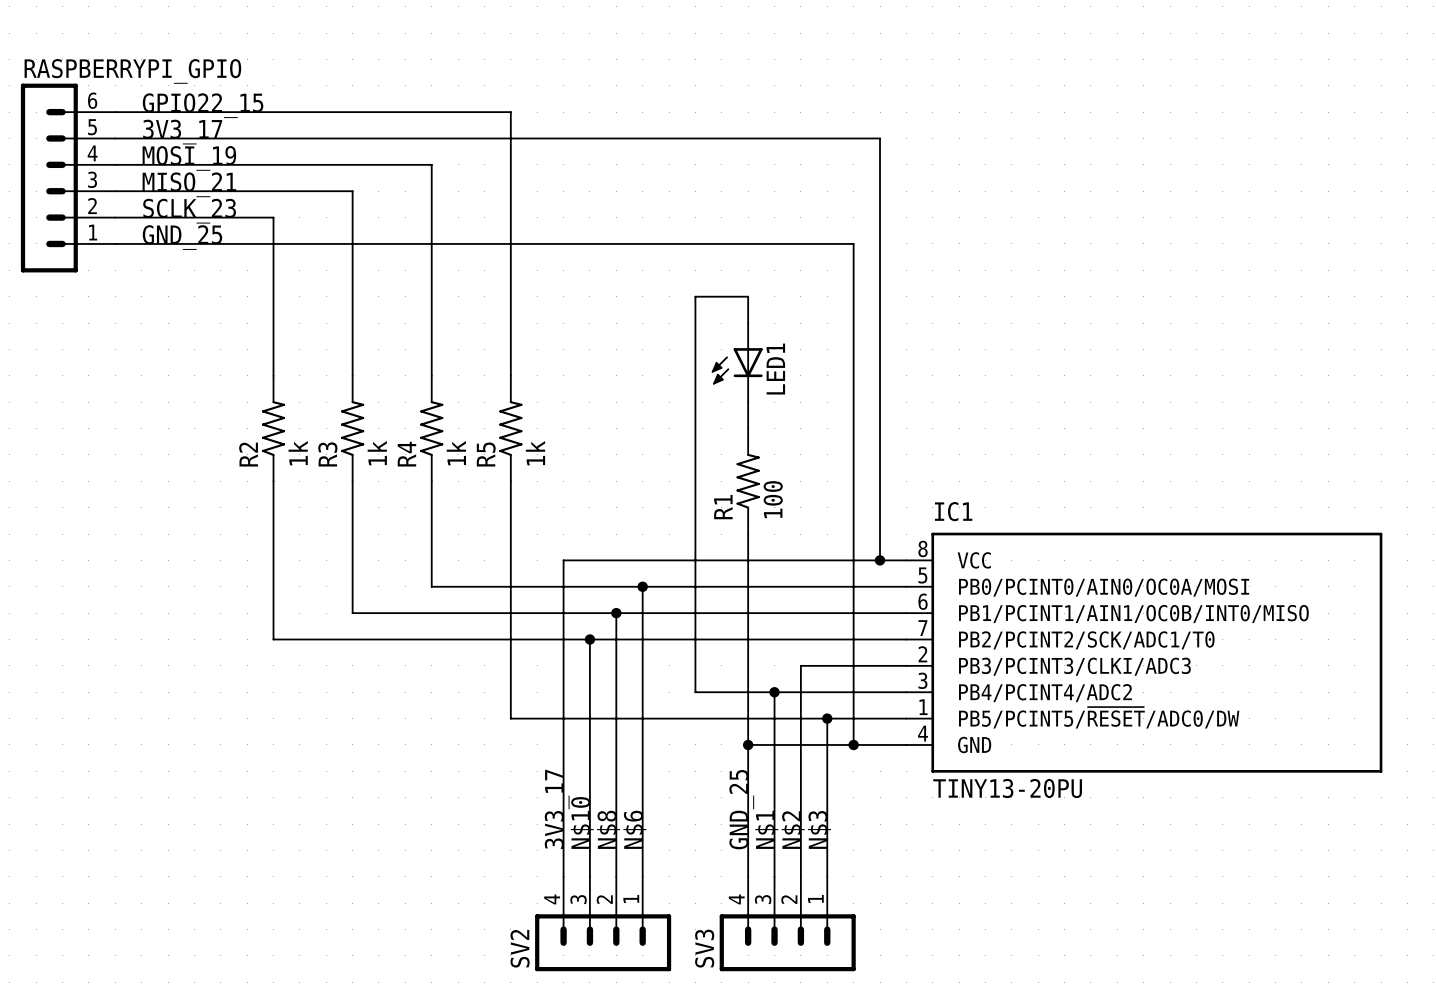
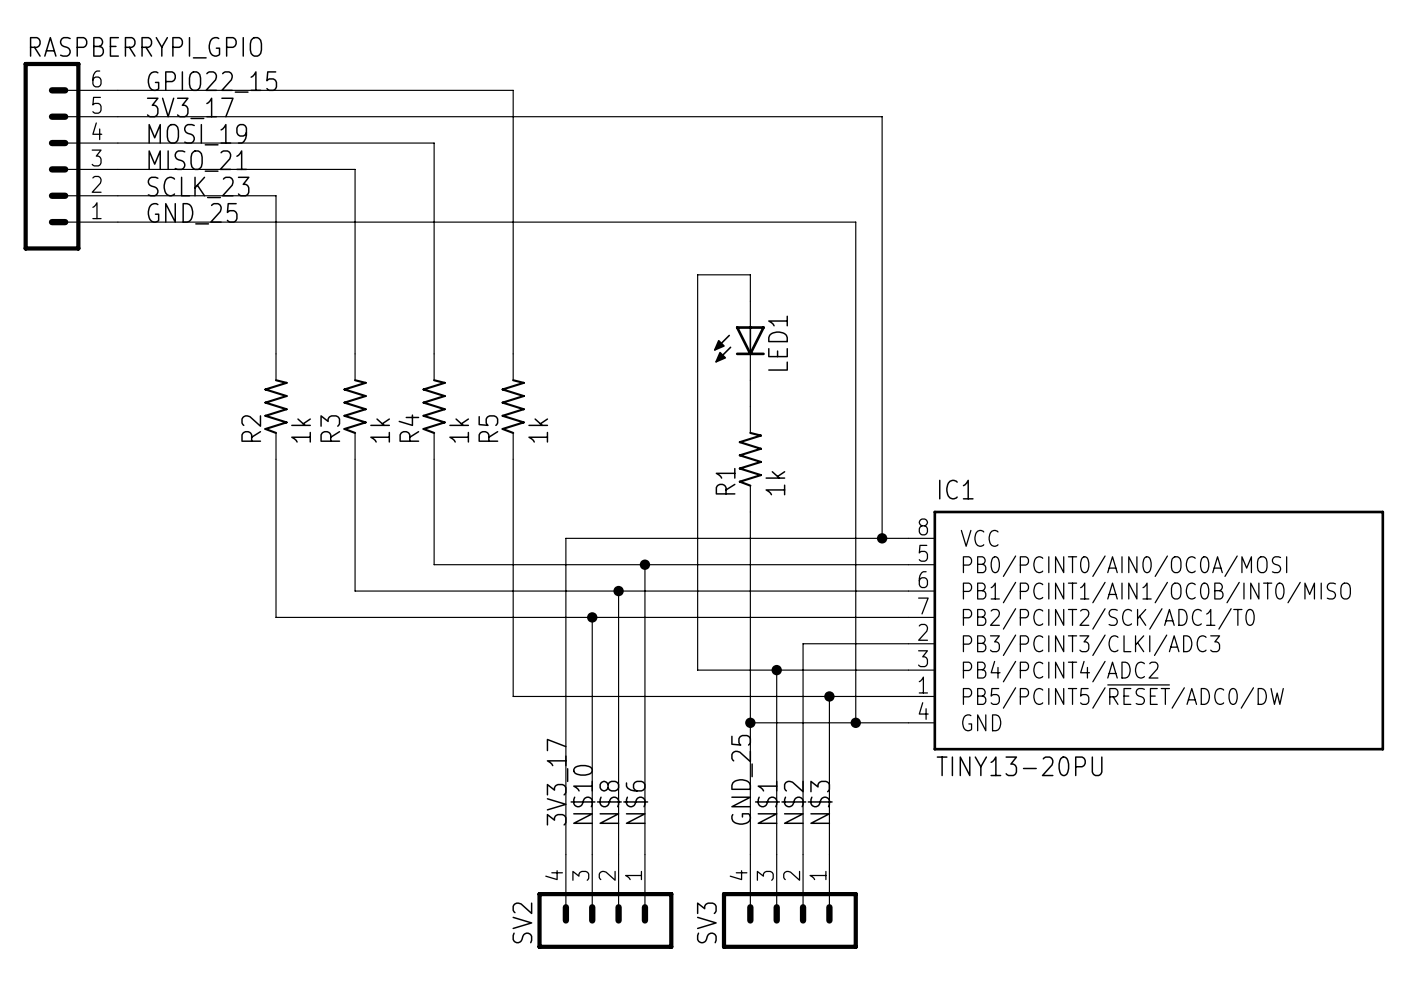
R1 value: 100 (773, 499) -> 1k (775, 483)

